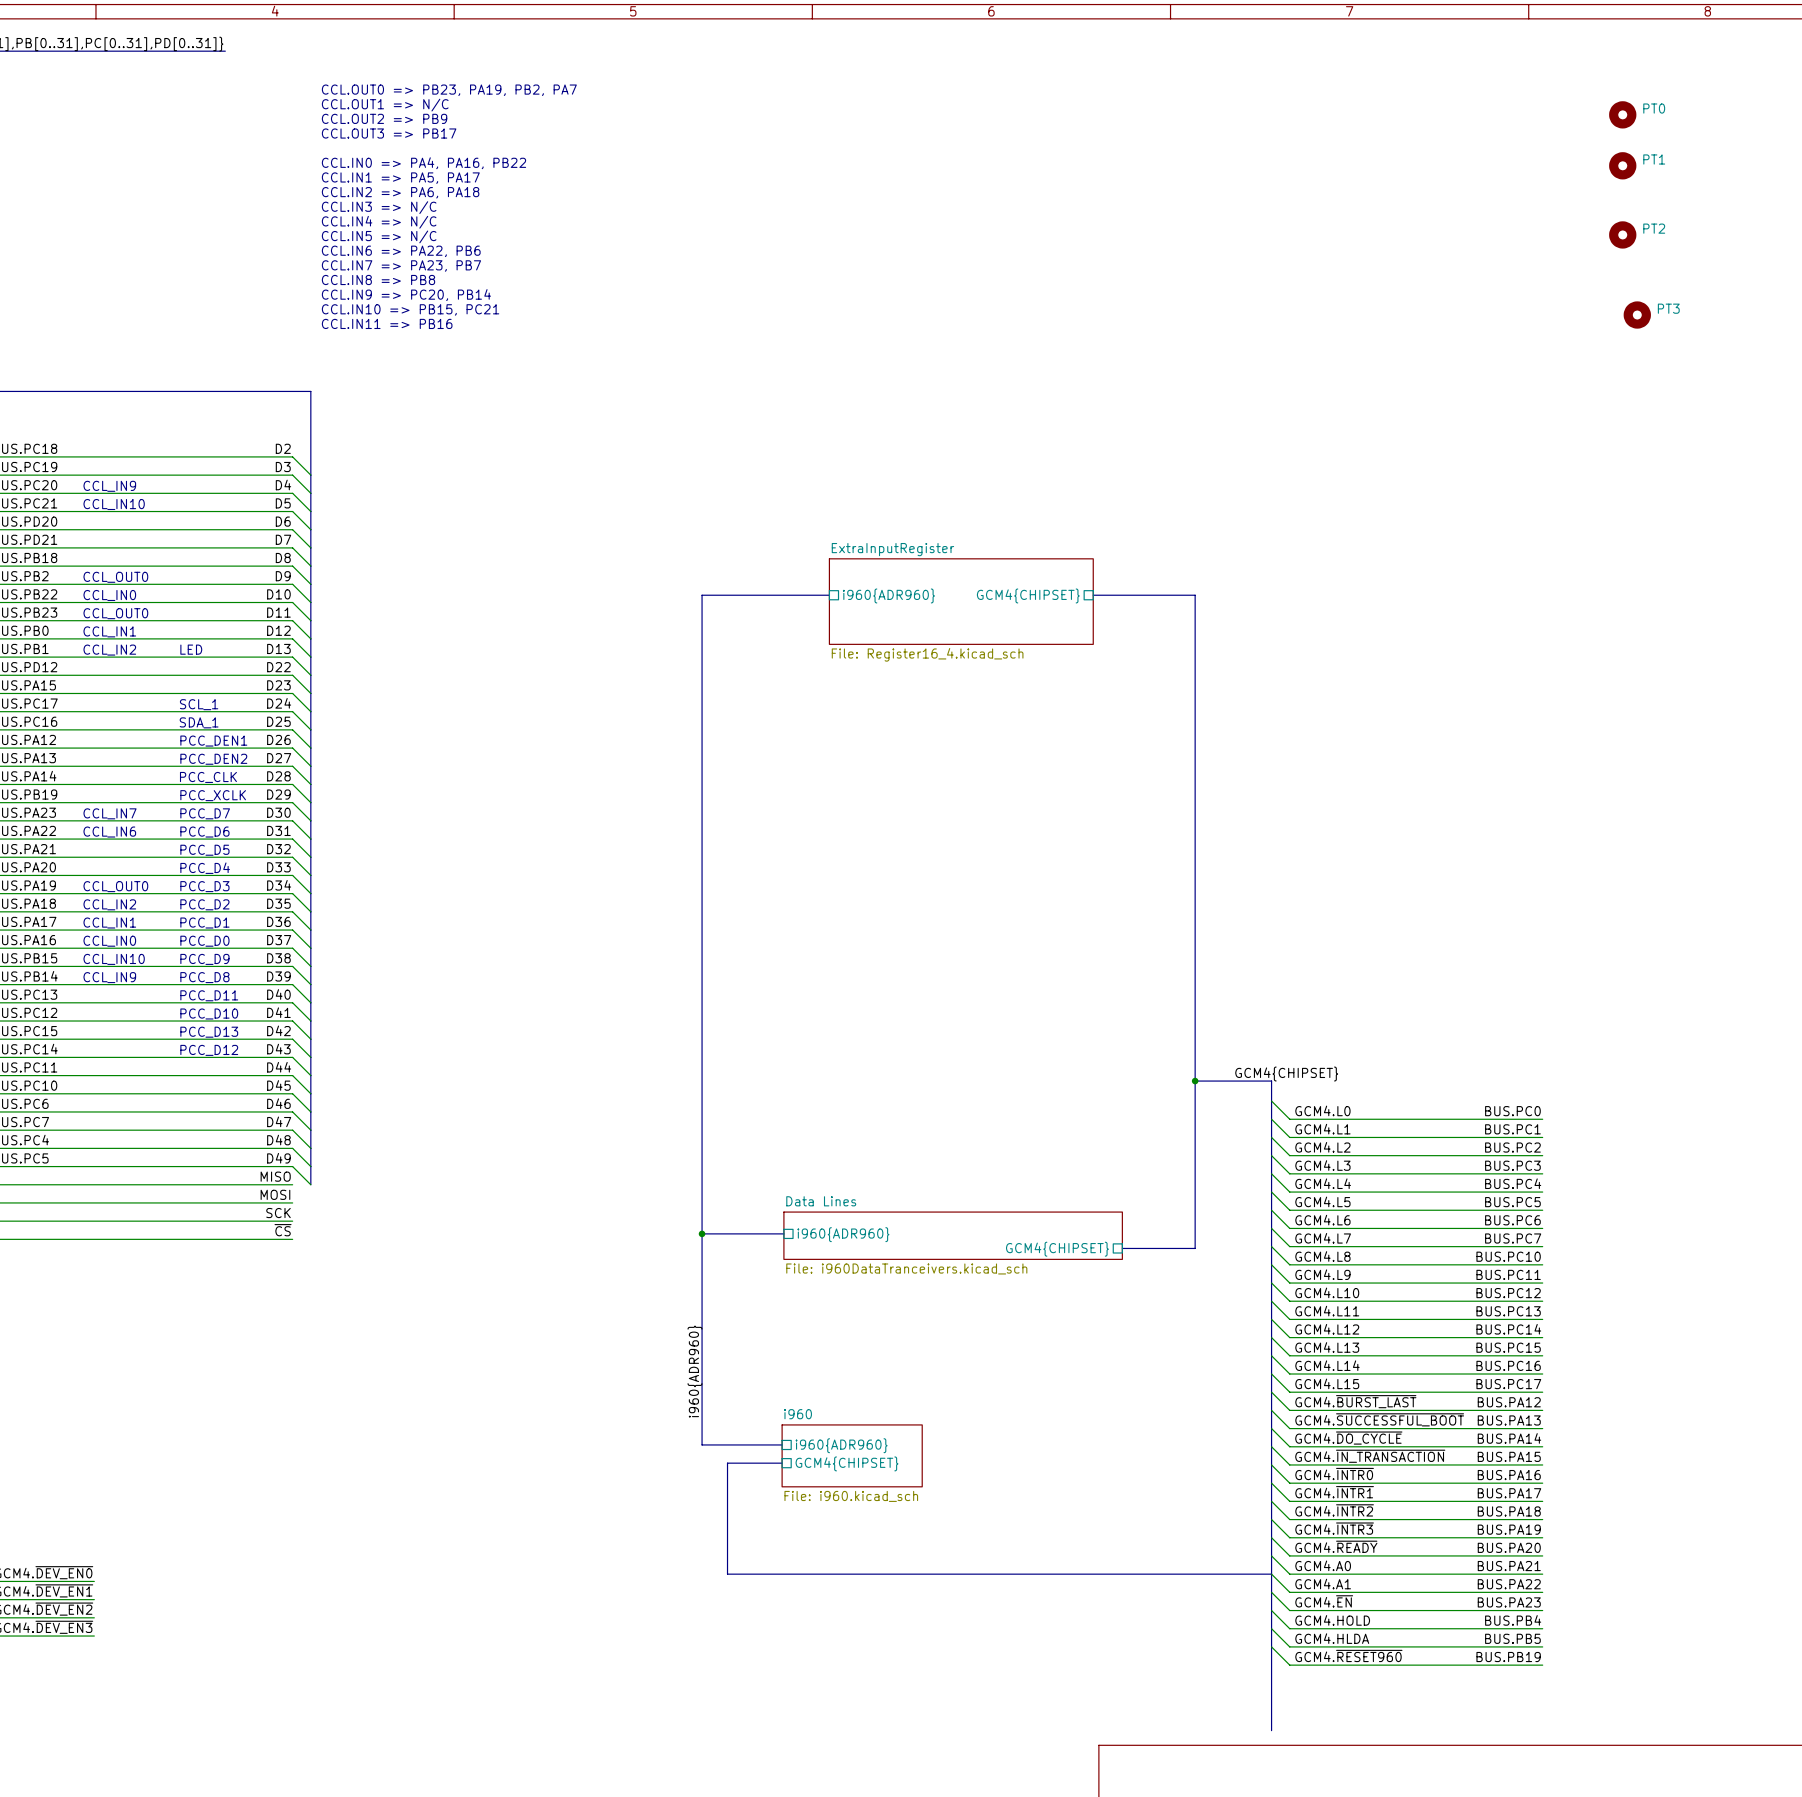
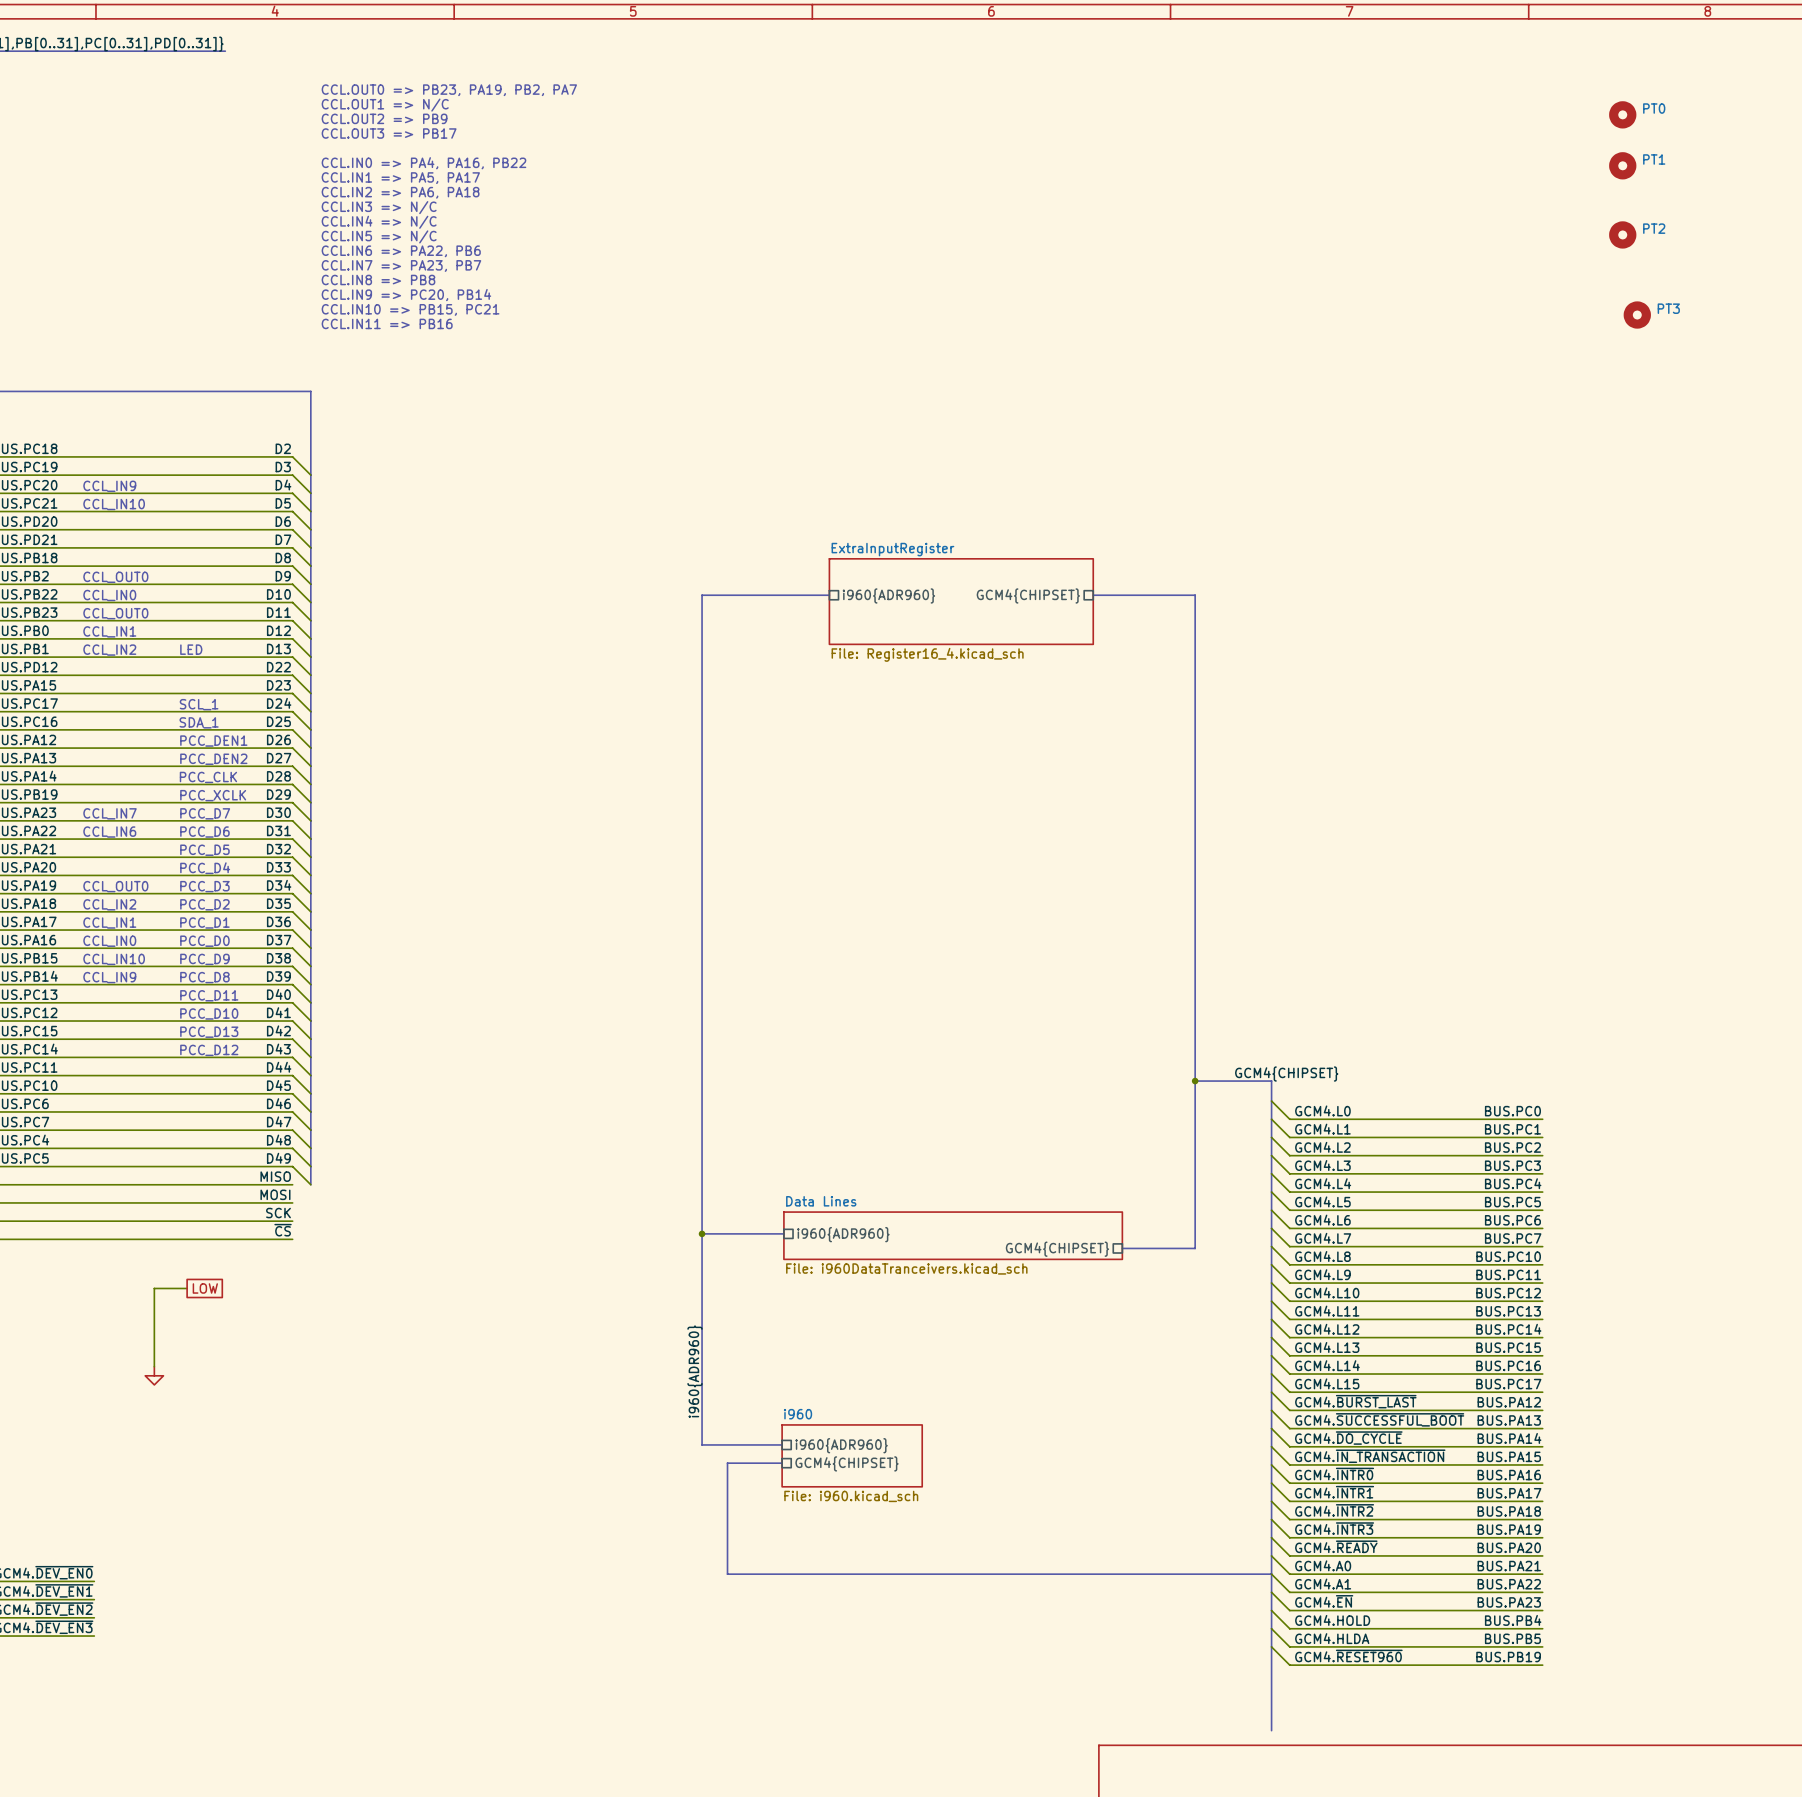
wire: none -> (187, 1288) (154, 1288) (154, 1366)
global label: none -> LOW (205, 1288)
power symbol: none -> (154, 1375)

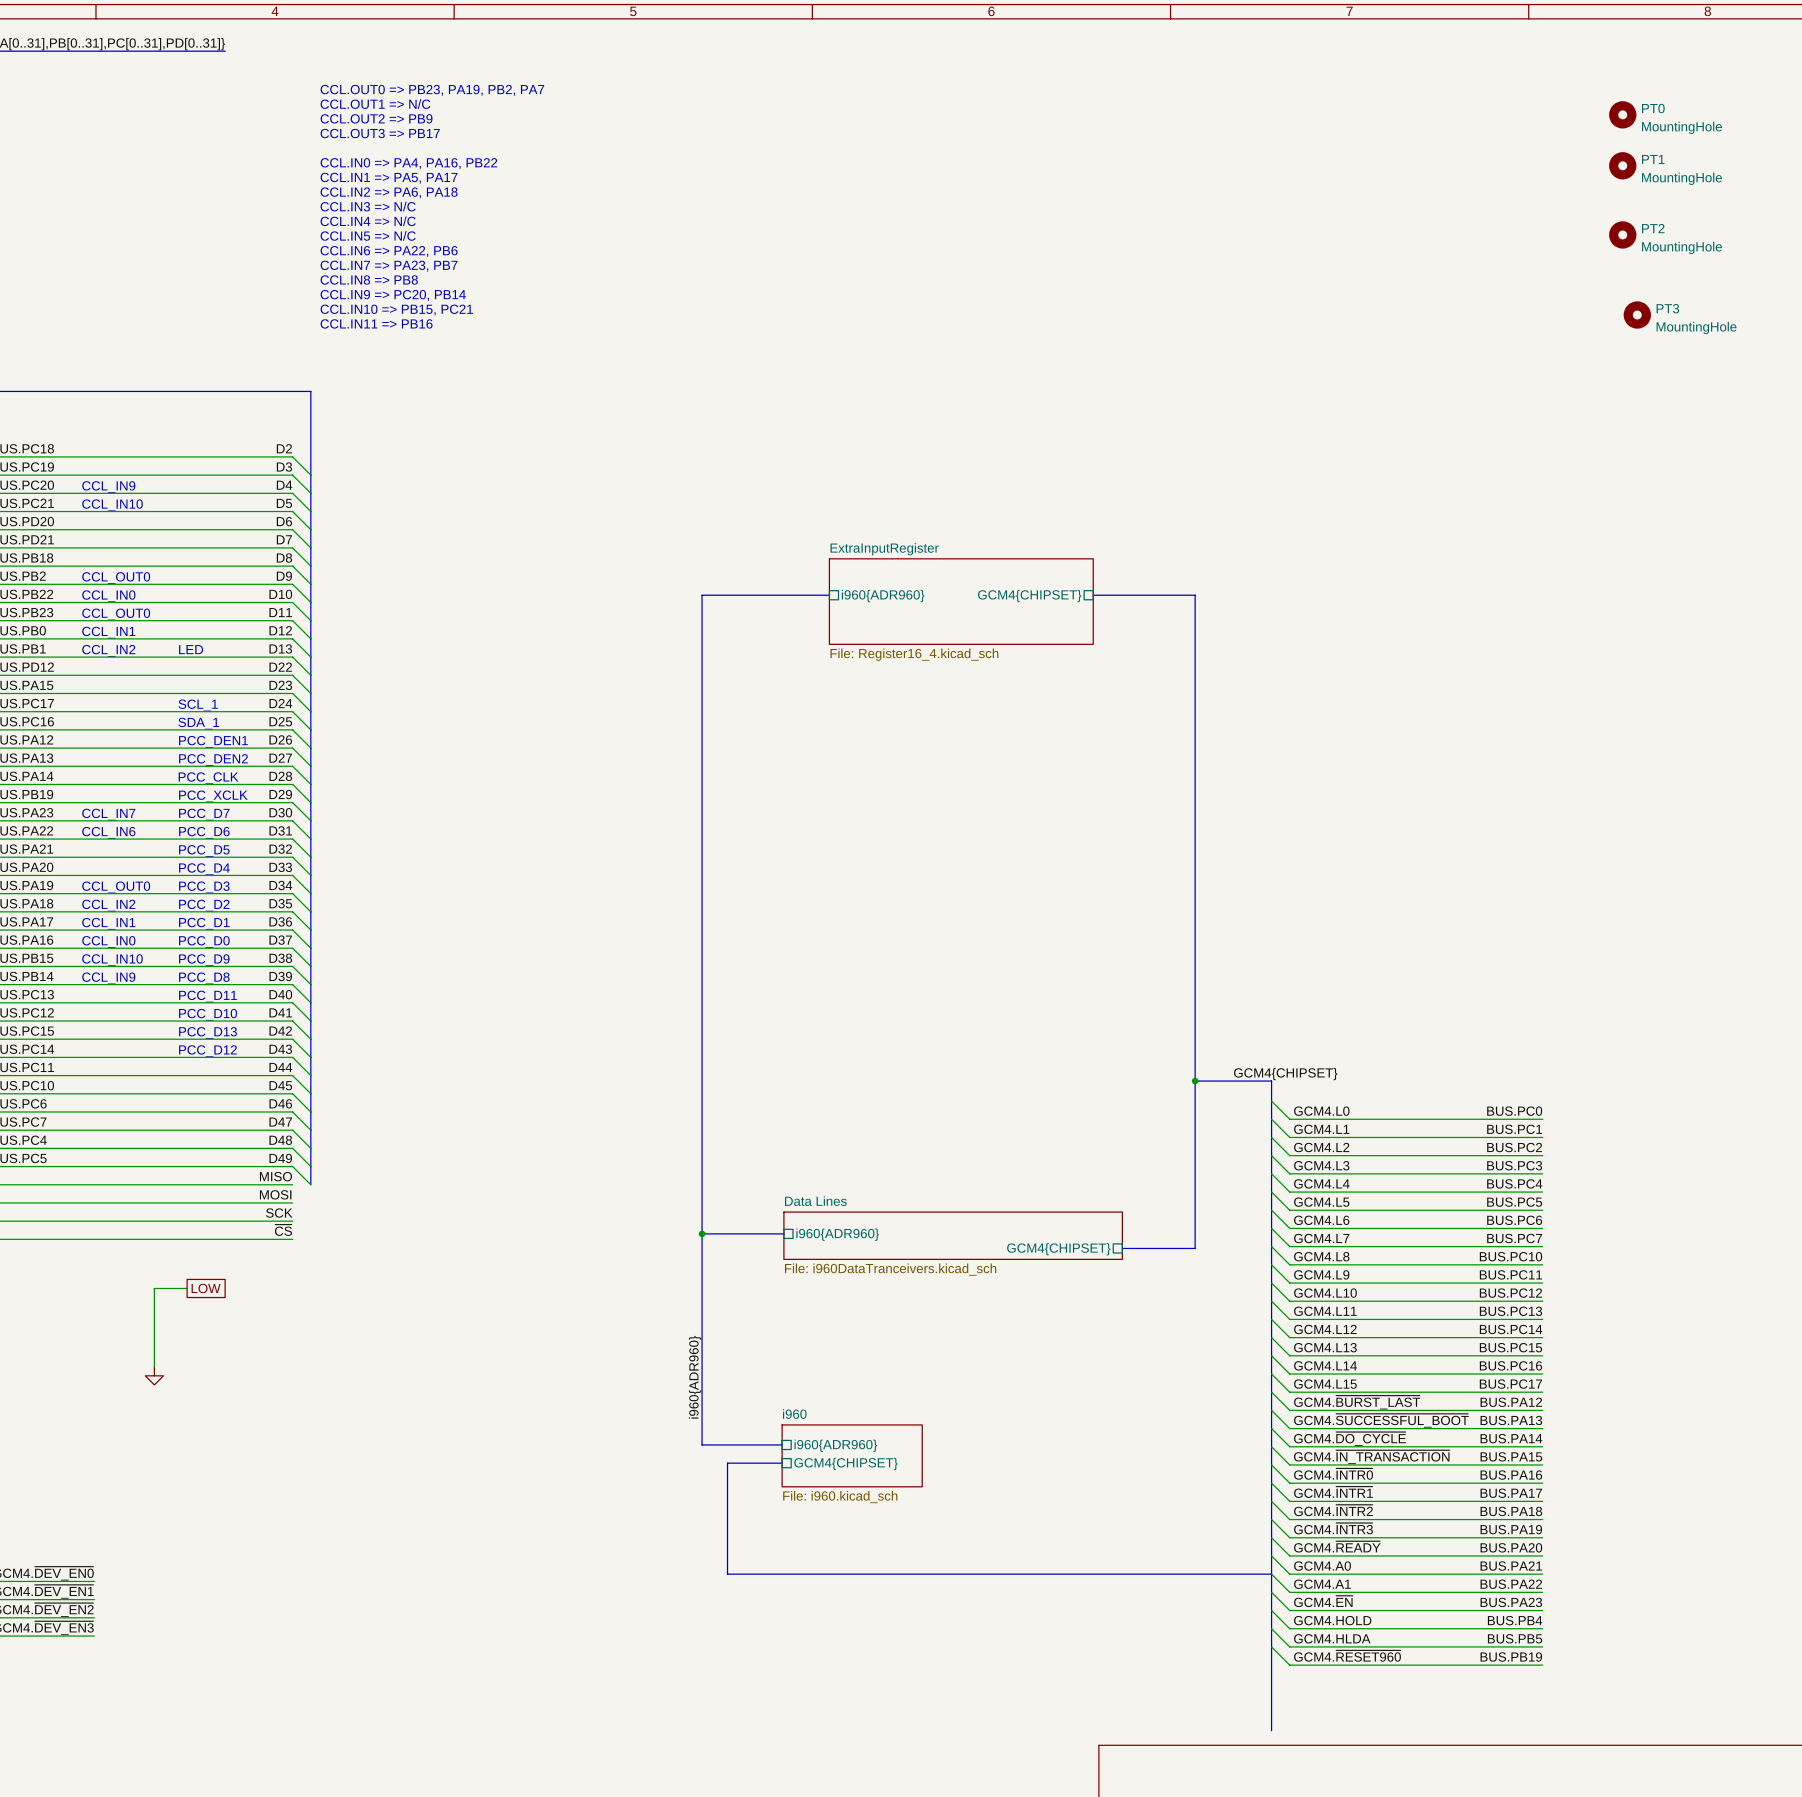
PT0 value: none -> MountingHole (1681, 127)
PT1 value: none -> MountingHole (1681, 178)
PT2 value: none -> MountingHole (1681, 247)
PT3 value: none -> MountingHole (1696, 327)

